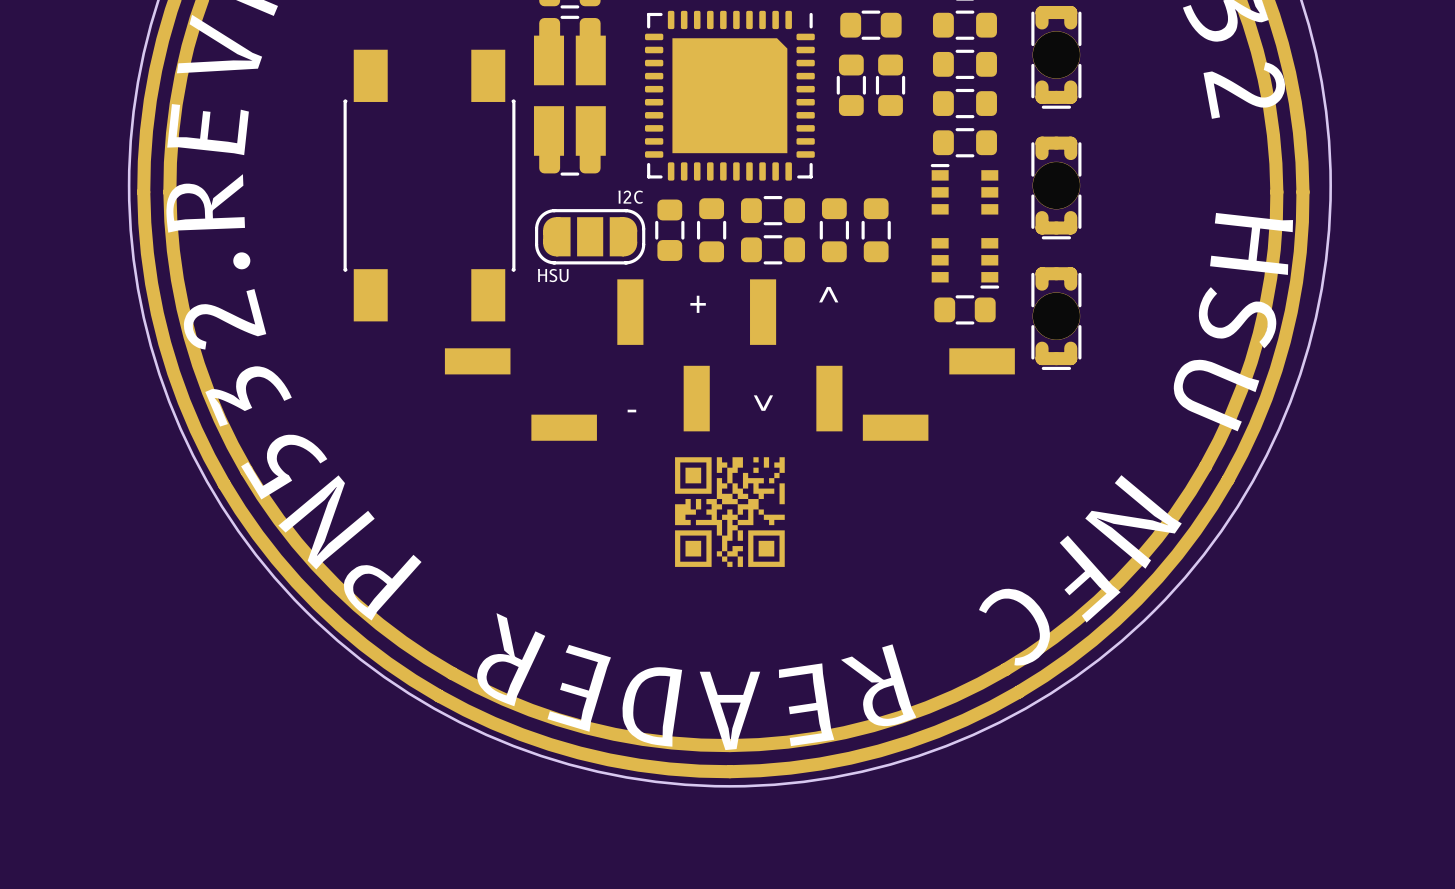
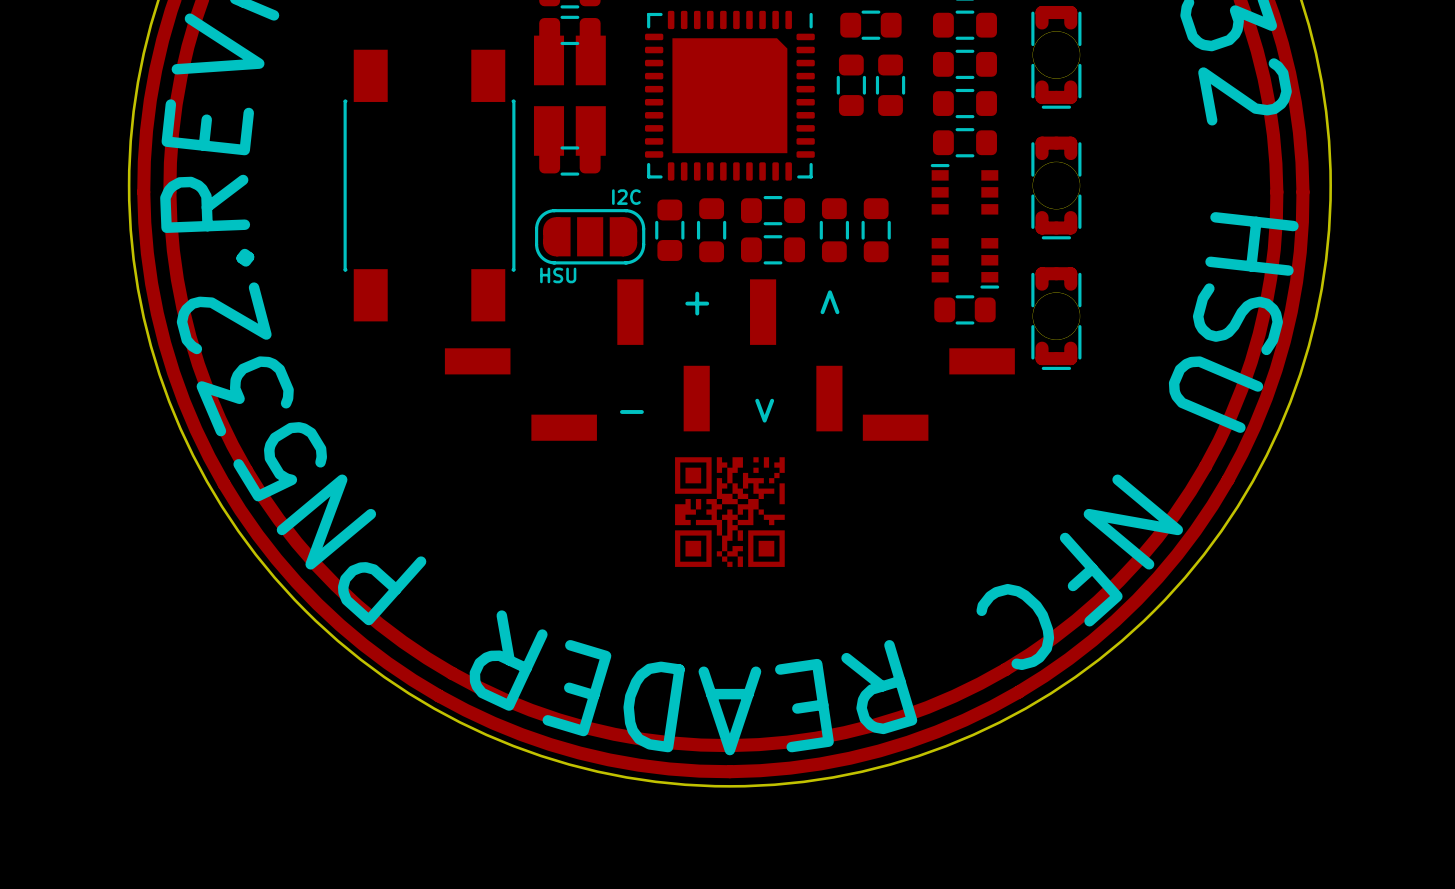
part footprint: [539, 15, 601, 43] -> [539, 15, 601, 46]
part footprint: [539, 148, 601, 176] -> [539, 146, 601, 176]

